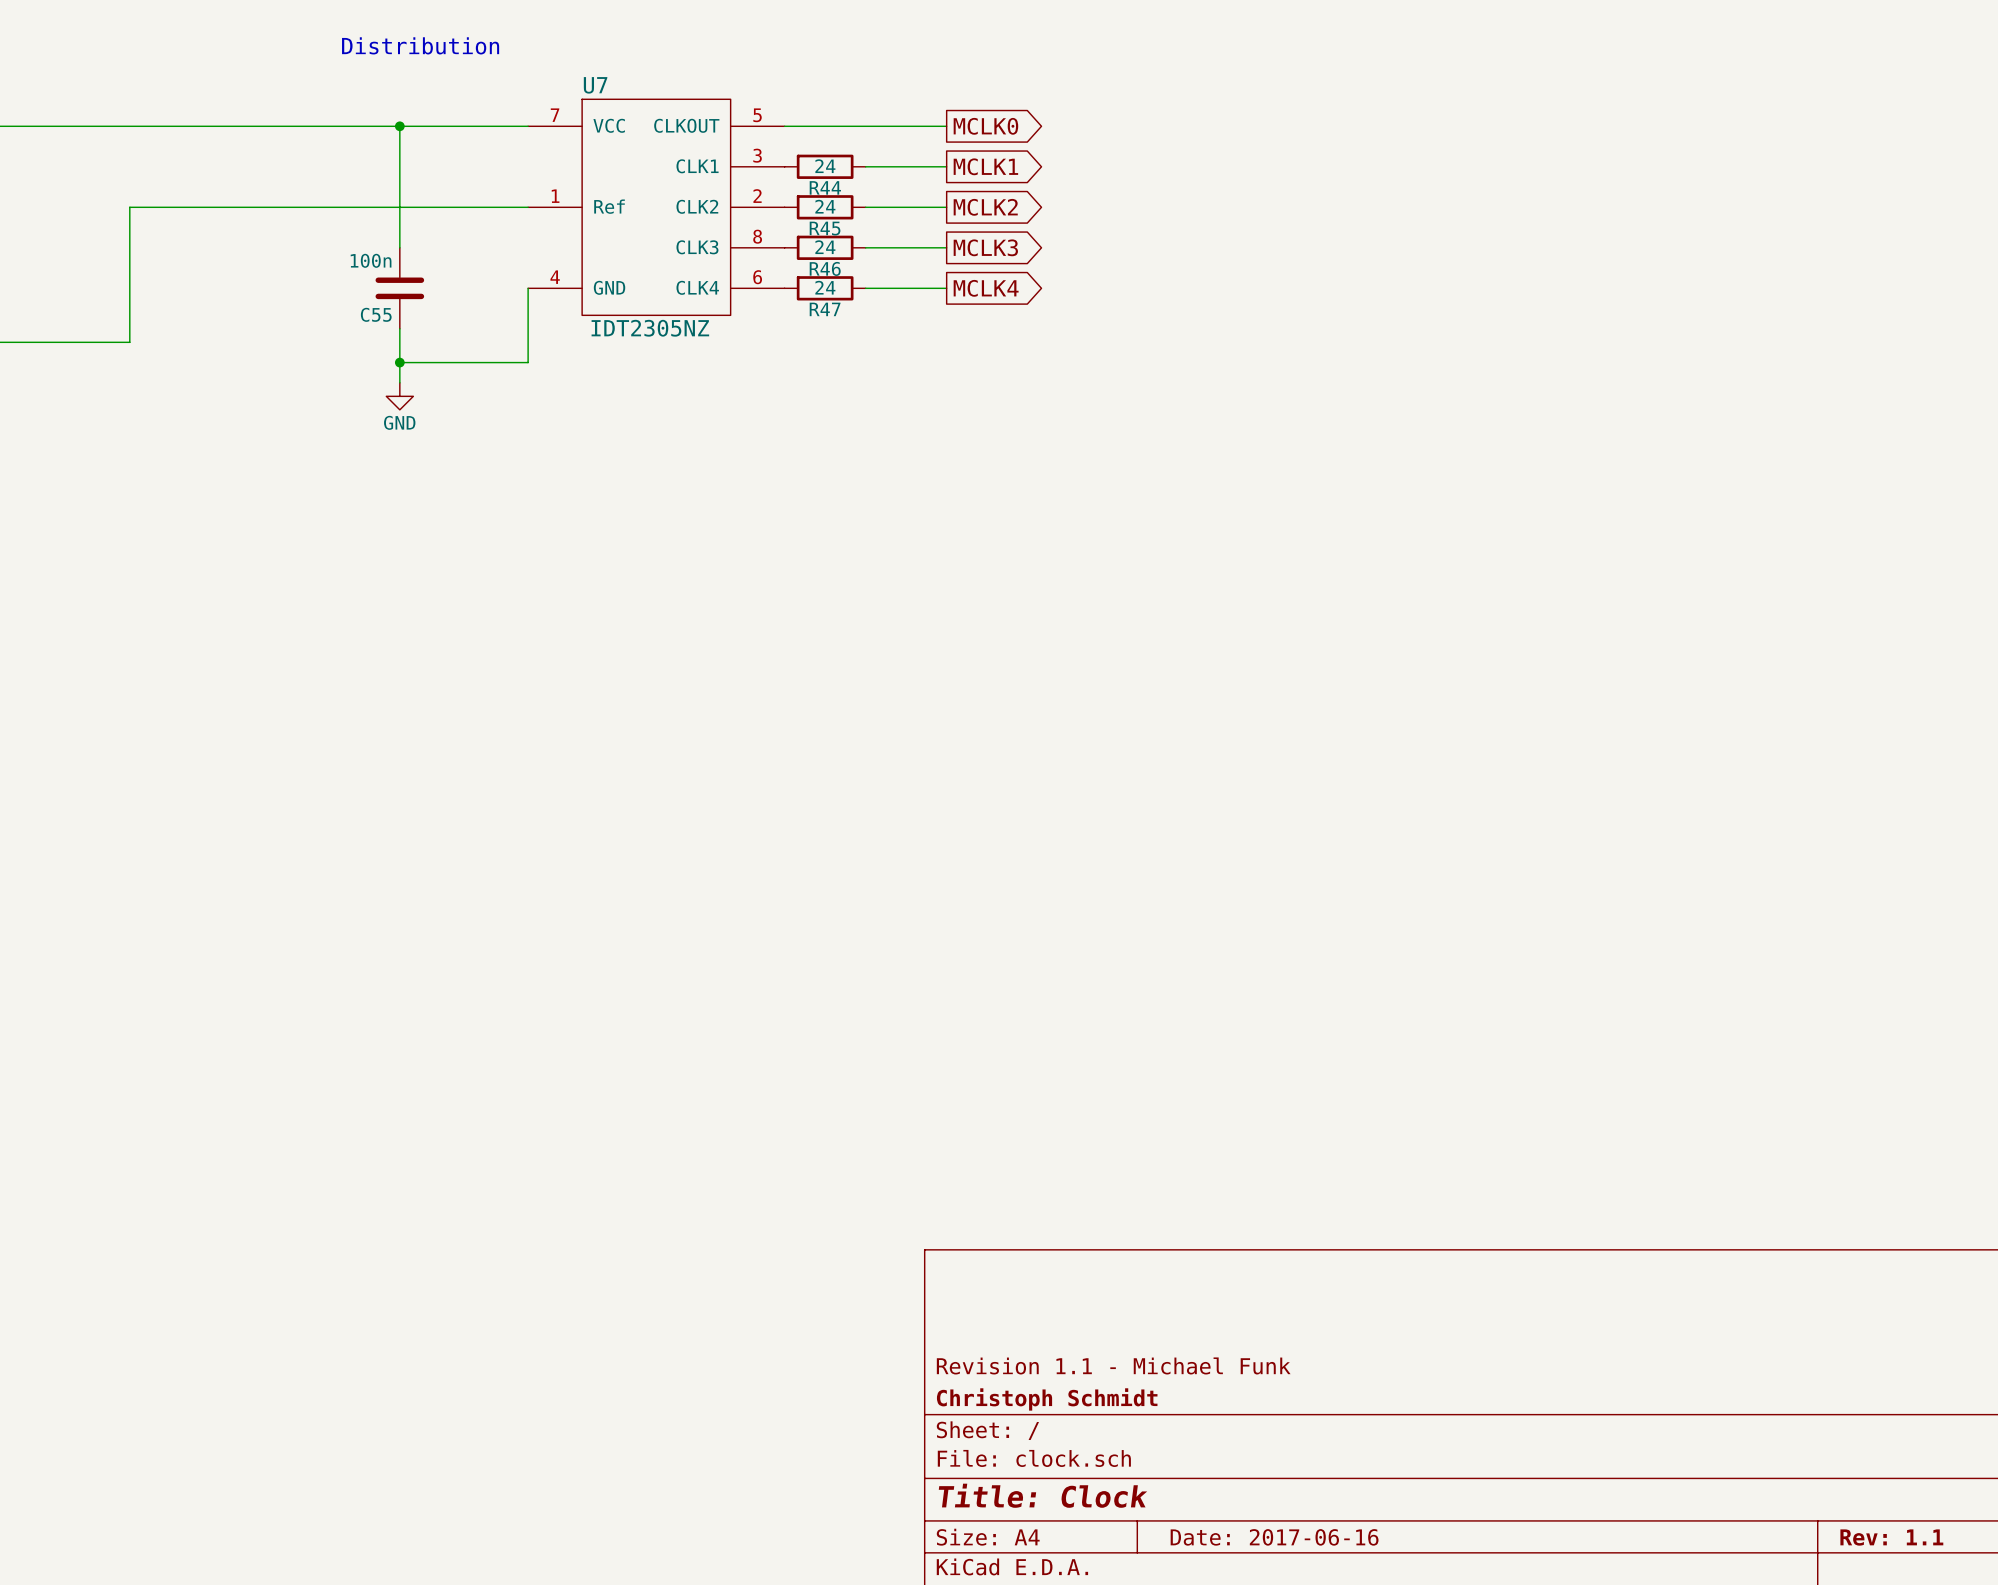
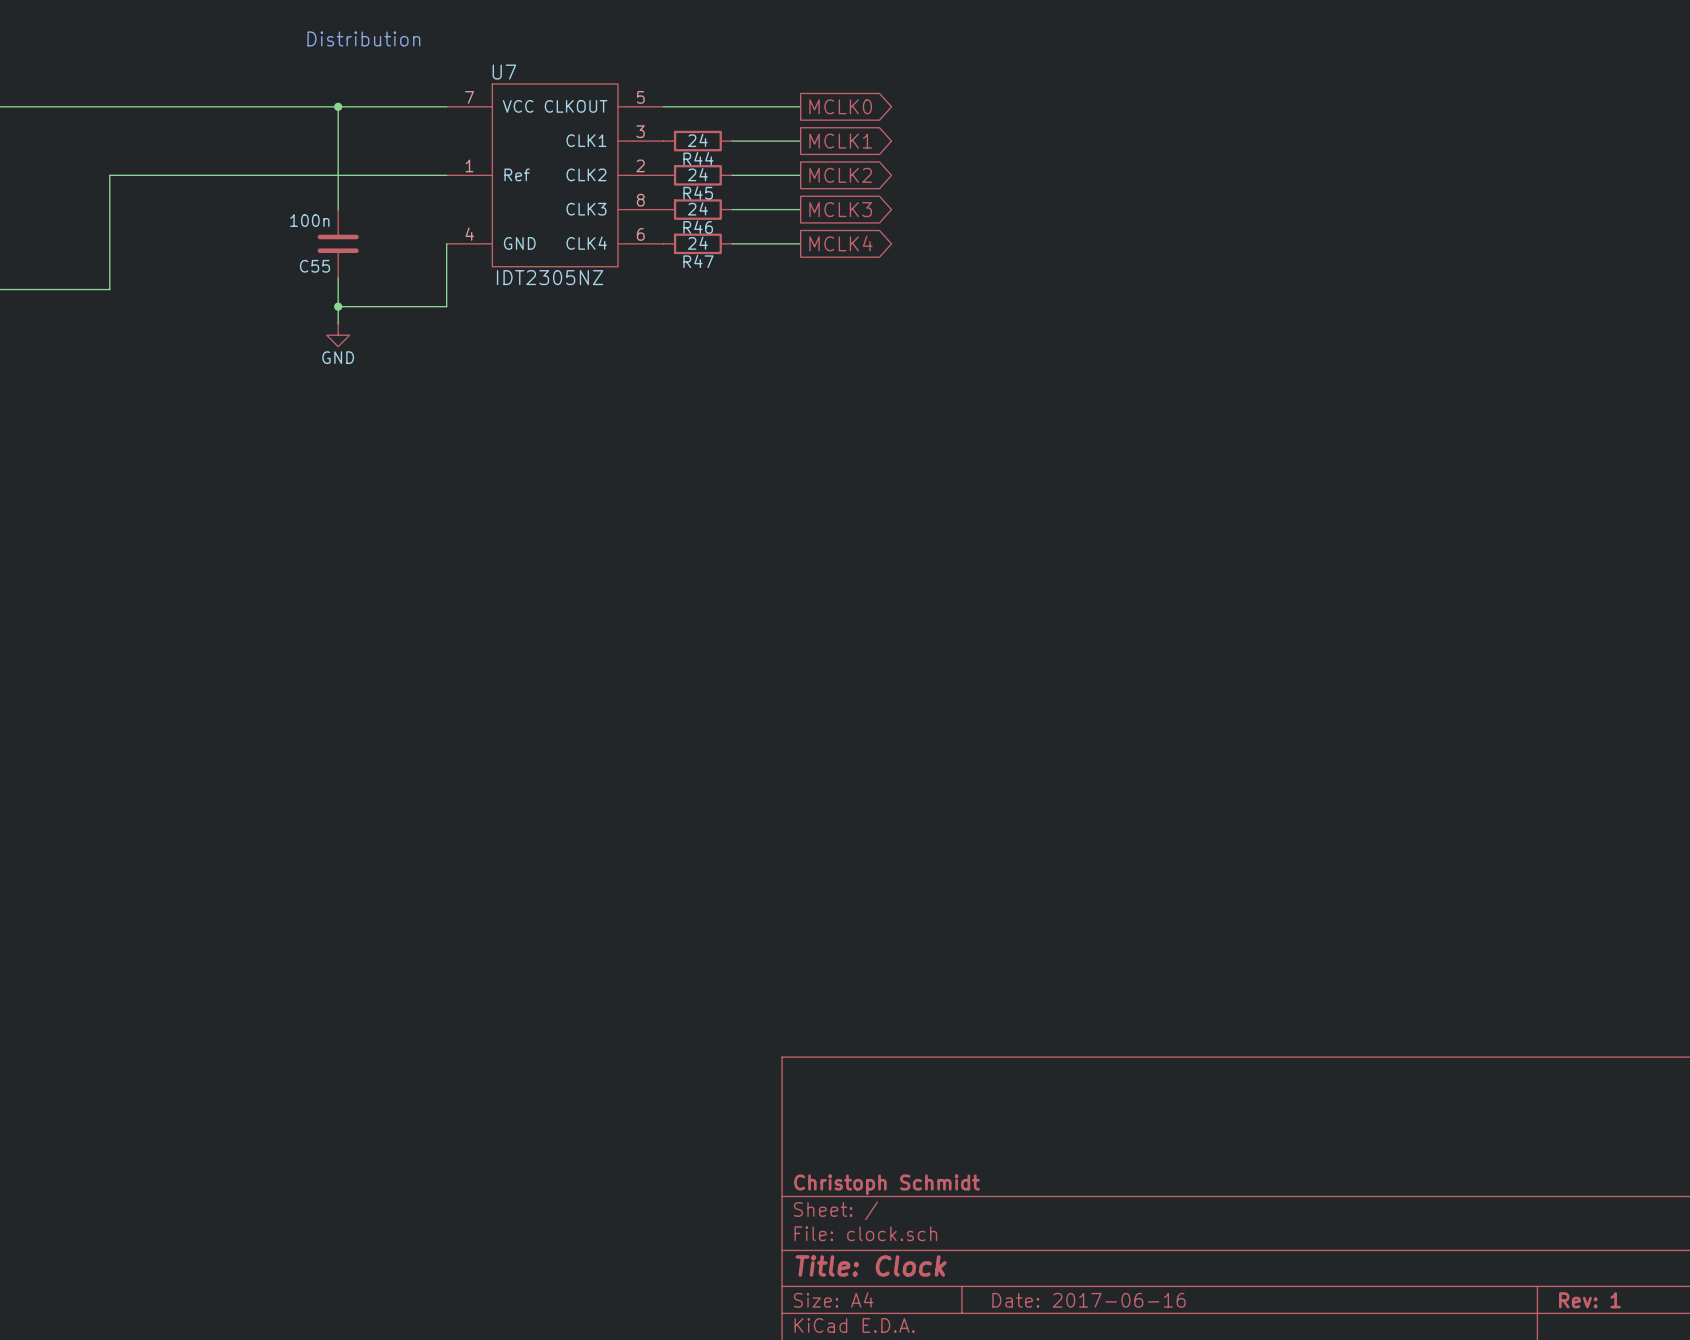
title block: Revision 1.1 - Michael Funk (1113, 1365) -> none
title block: Rev: 1.1 (1891, 1537) -> Rev: 1 (1589, 1300)

